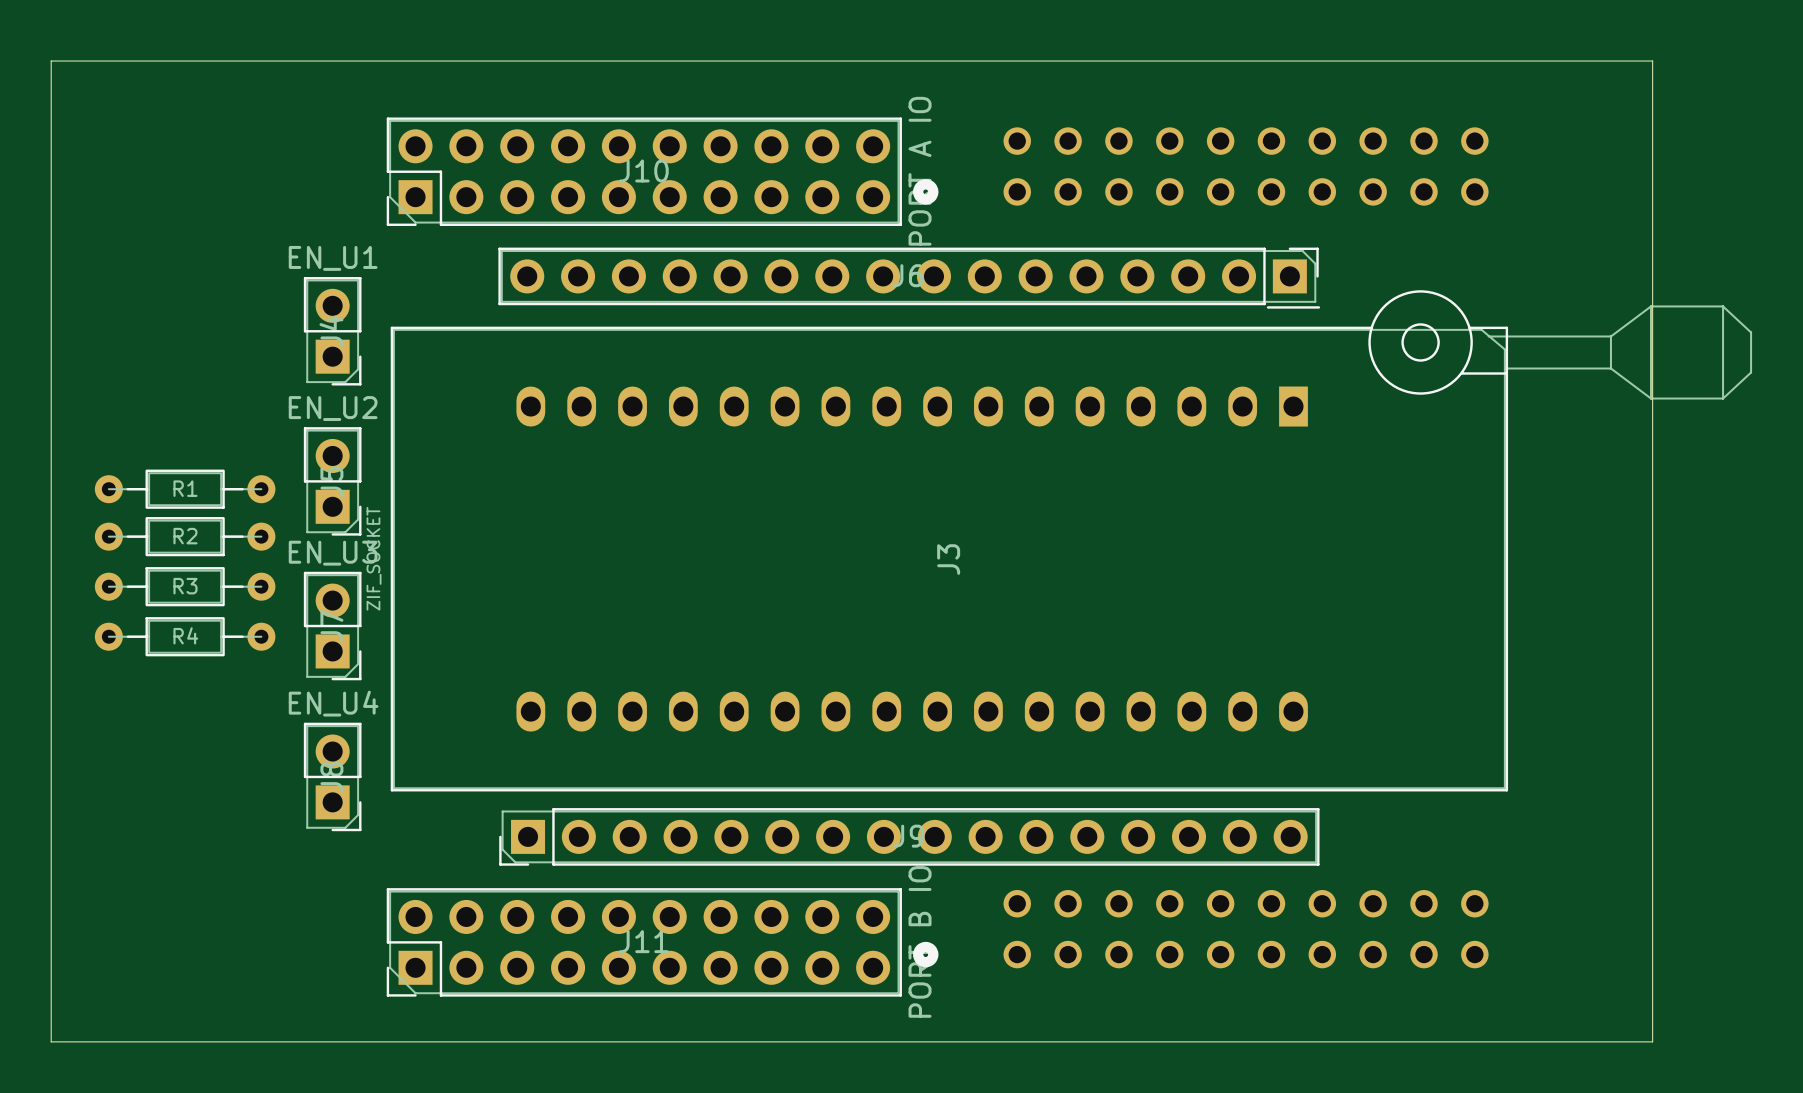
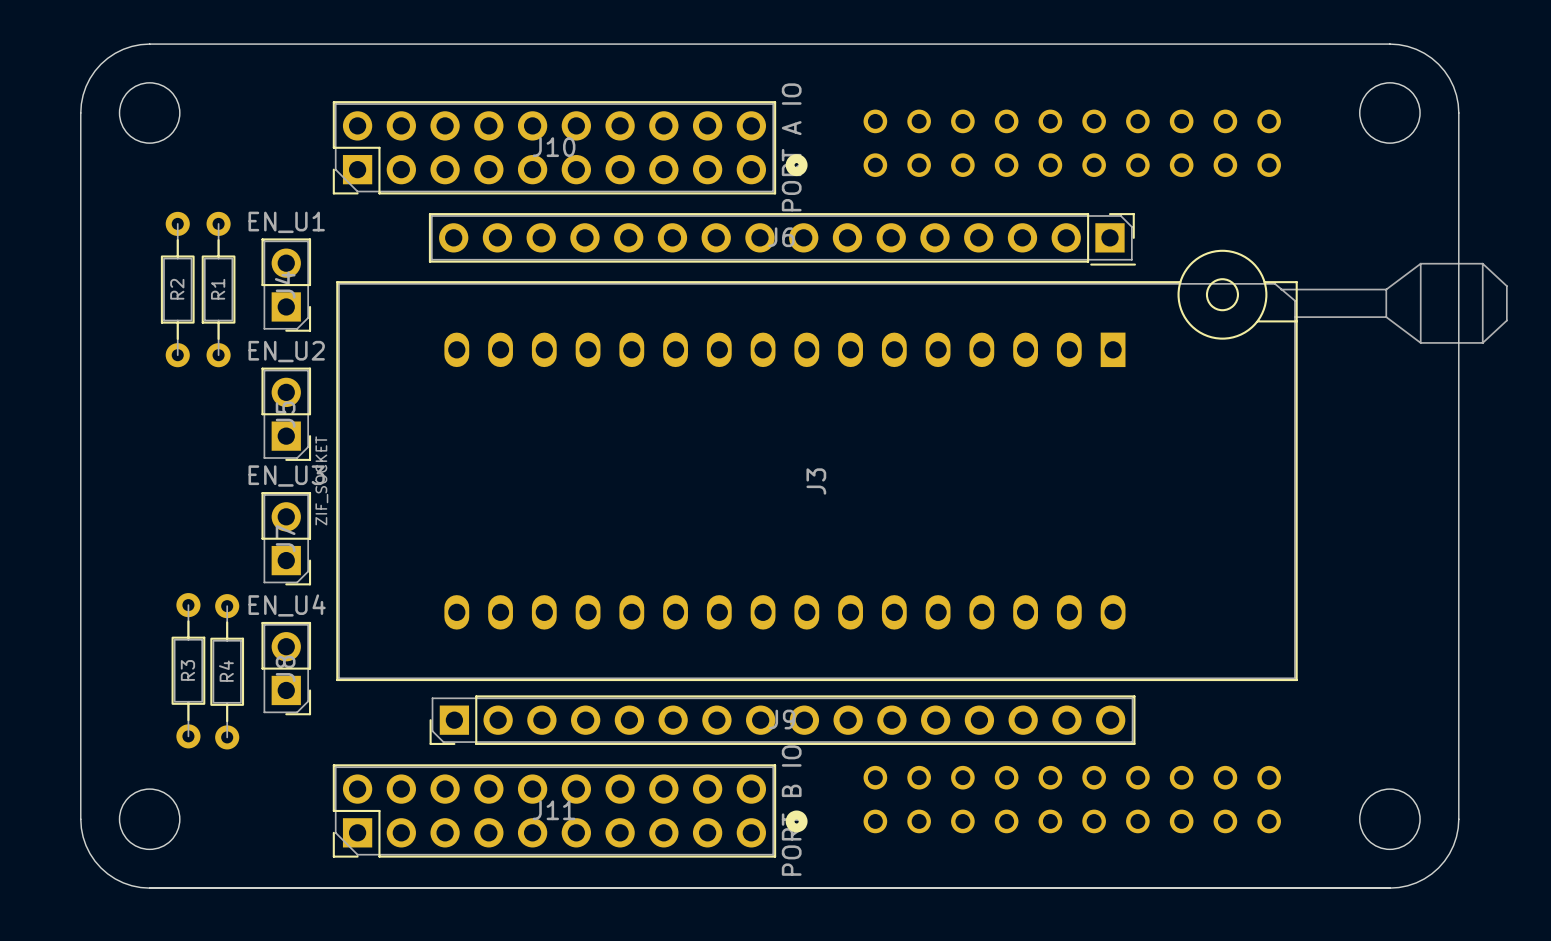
board edge: (51, 61) (51, 1041) (1652, 1041) (1652, 61) (51, 61) -> (149, 44) (123, 49) (100, 64) (86, 86) (80, 112) (80, 819) (83, 837) (90, 853) (100, 867) (115, 878) (131, 885) (149, 888) (1389, 888) (1407, 885) (1424, 878) (1438, 867) (1449, 853) (1456, 837) (1458, 819) (1458, 112) (1456, 95) (1449, 78) (1438, 64) (1424, 53) (1407, 46) (1389, 44) (149, 44)
round board edge: none -> [119, 82, 181, 144]
round board edge: none -> [1359, 82, 1421, 144]
R1 rotation: 0° (185, 489) -> 90° clockwise (218, 289)
R1 position: (185, 489) -> (218, 289)
R2 rotation: 0° (185, 536) -> 90° clockwise (177, 289)
R2 position: (185, 536) -> (177, 289)
R3 rotation: 0° (185, 586) -> 90° clockwise (188, 670)
R3 position: (185, 586) -> (188, 670)
R4 rotation: 0° (185, 636) -> 90° clockwise (227, 671)
R4 position: (185, 636) -> (227, 671)
round board edge: none -> [119, 788, 181, 850]
round board edge: none -> [1359, 788, 1421, 850]

